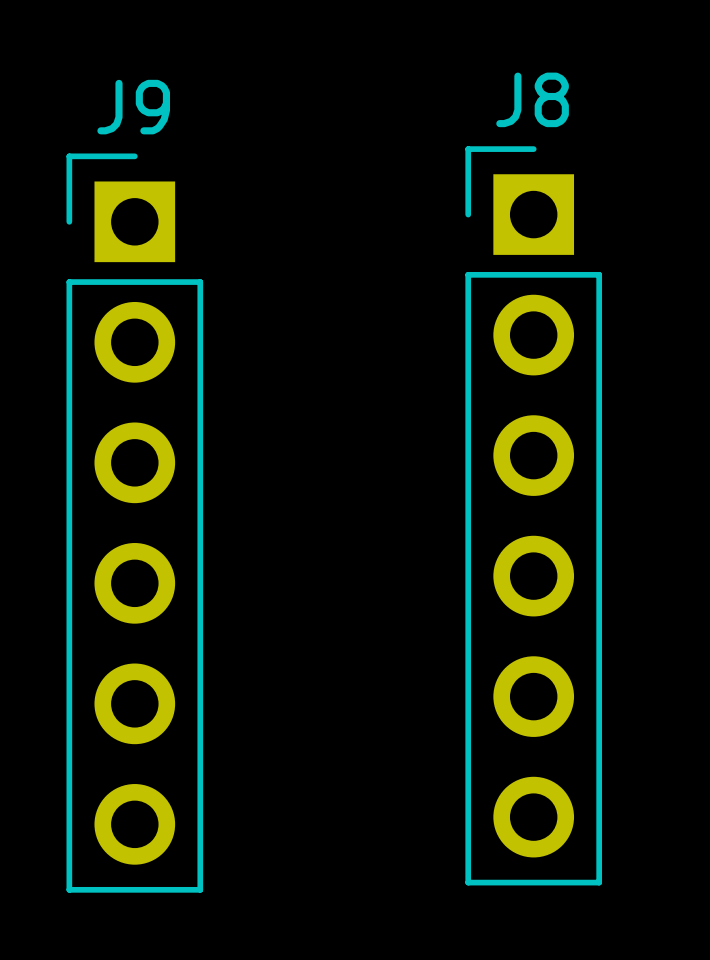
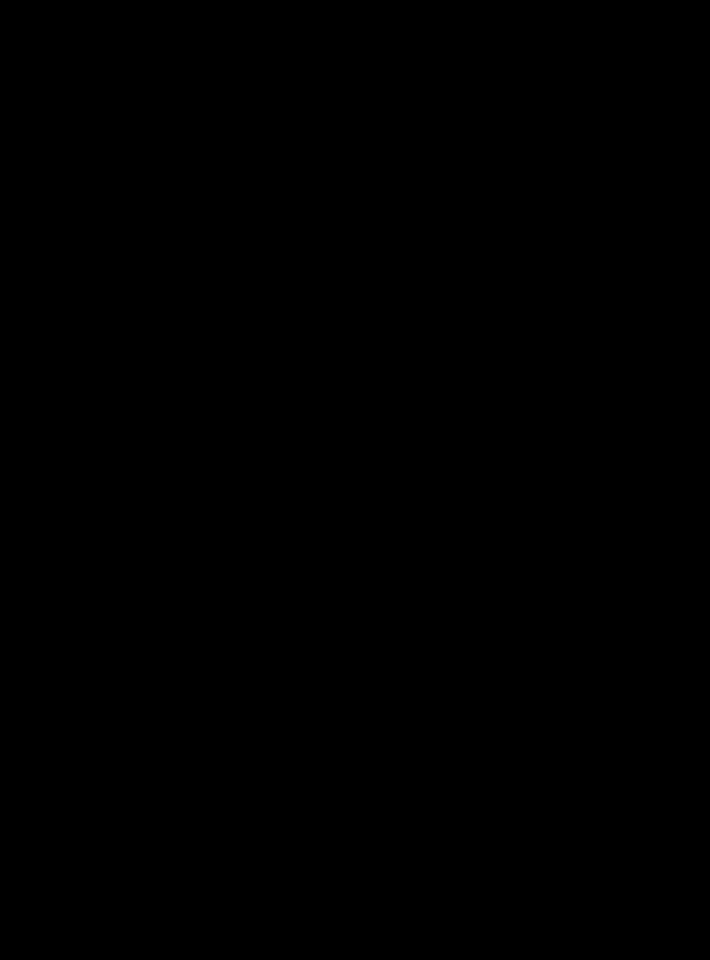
J8: (533, 515) -> none
J9: (134, 523) -> none

